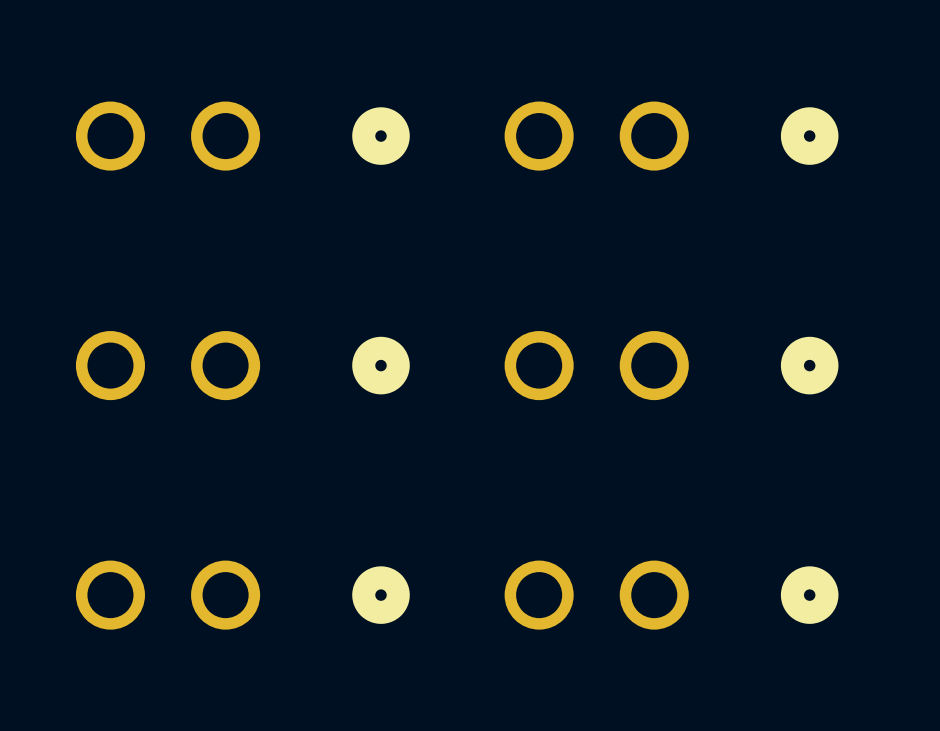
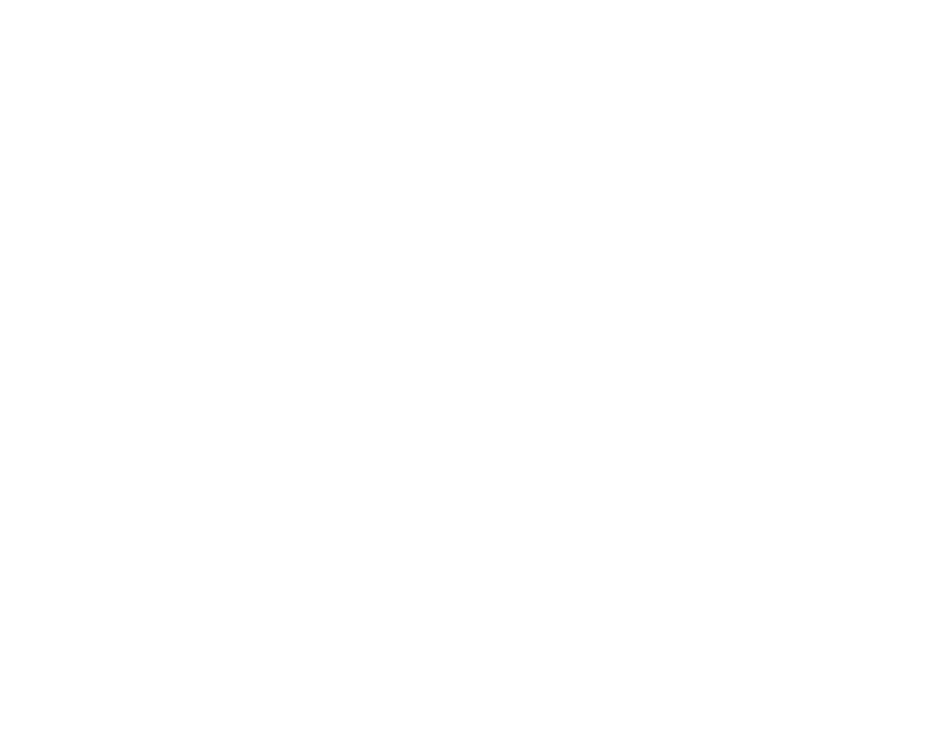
part: (242, 136) -> none
part: (671, 136) -> none
part: (242, 365) -> none
part: (671, 365) -> none
part: (242, 595) -> none
part: (671, 595) -> none

